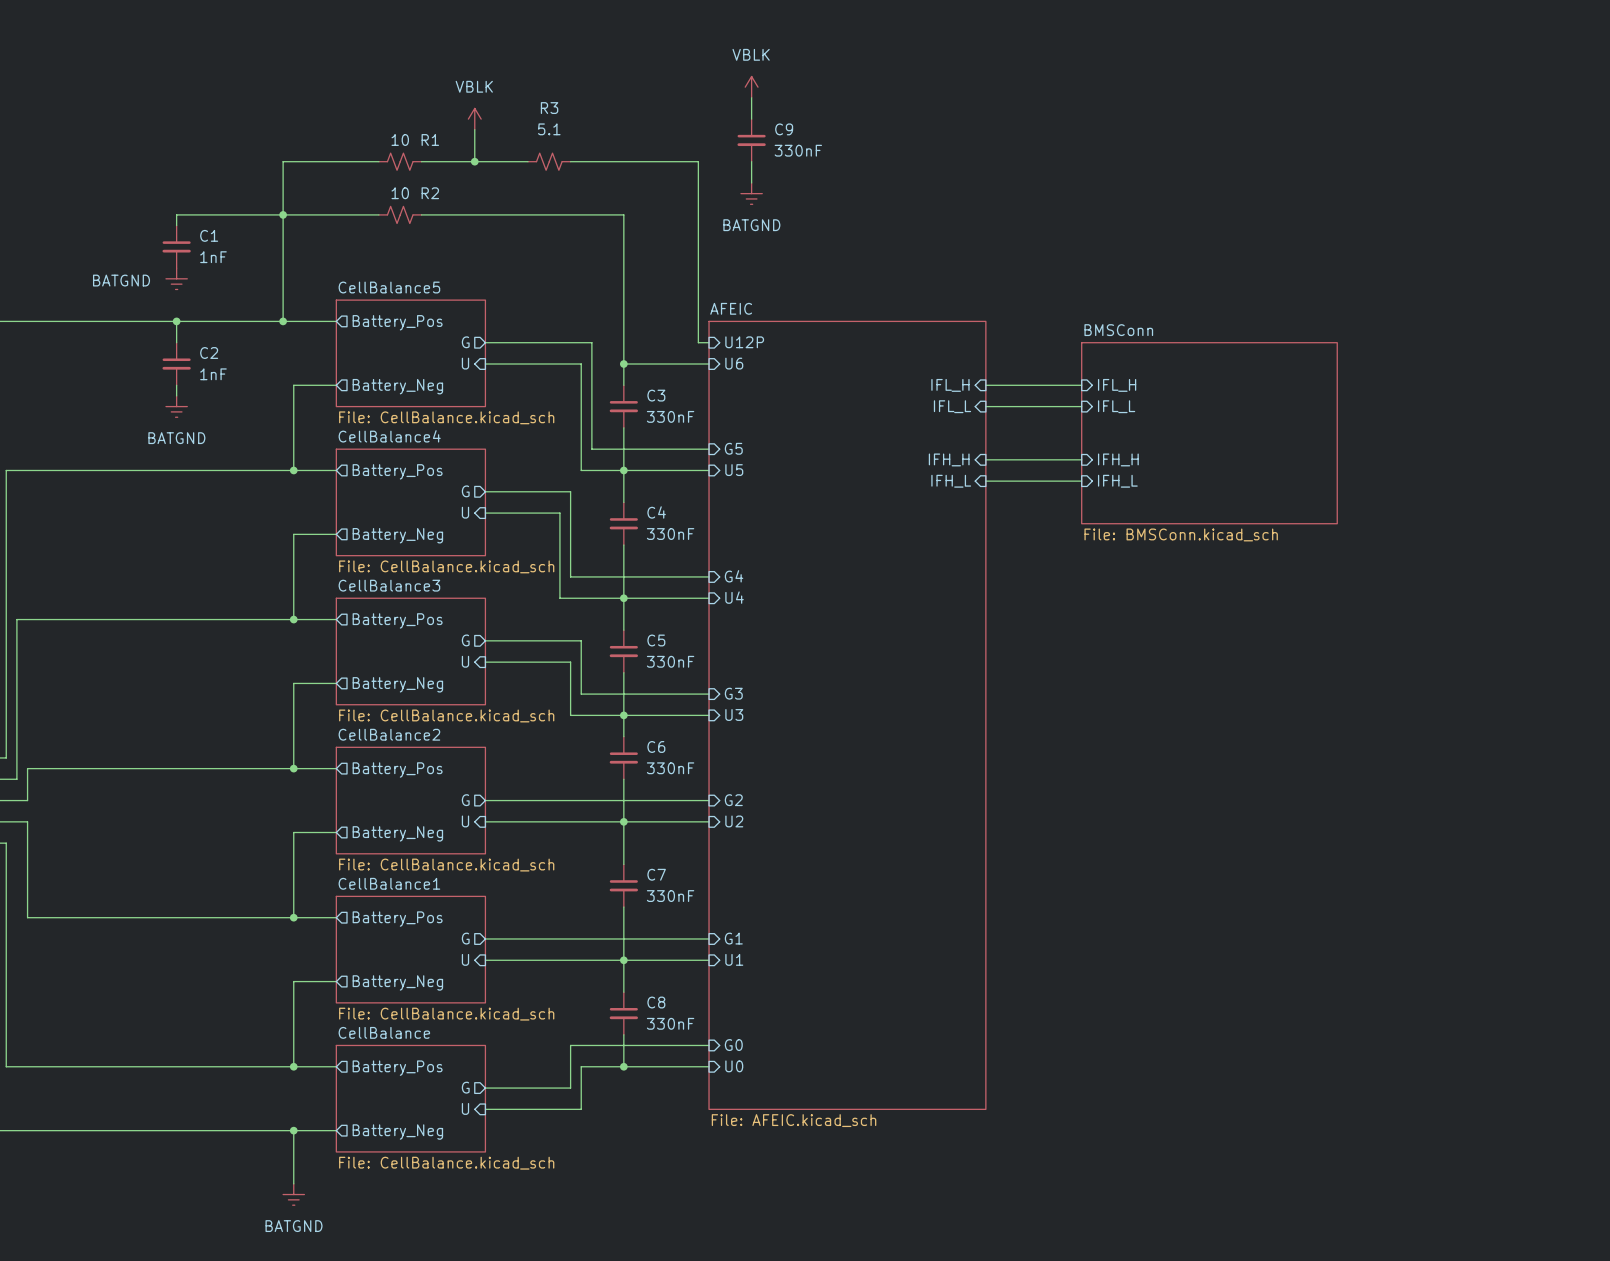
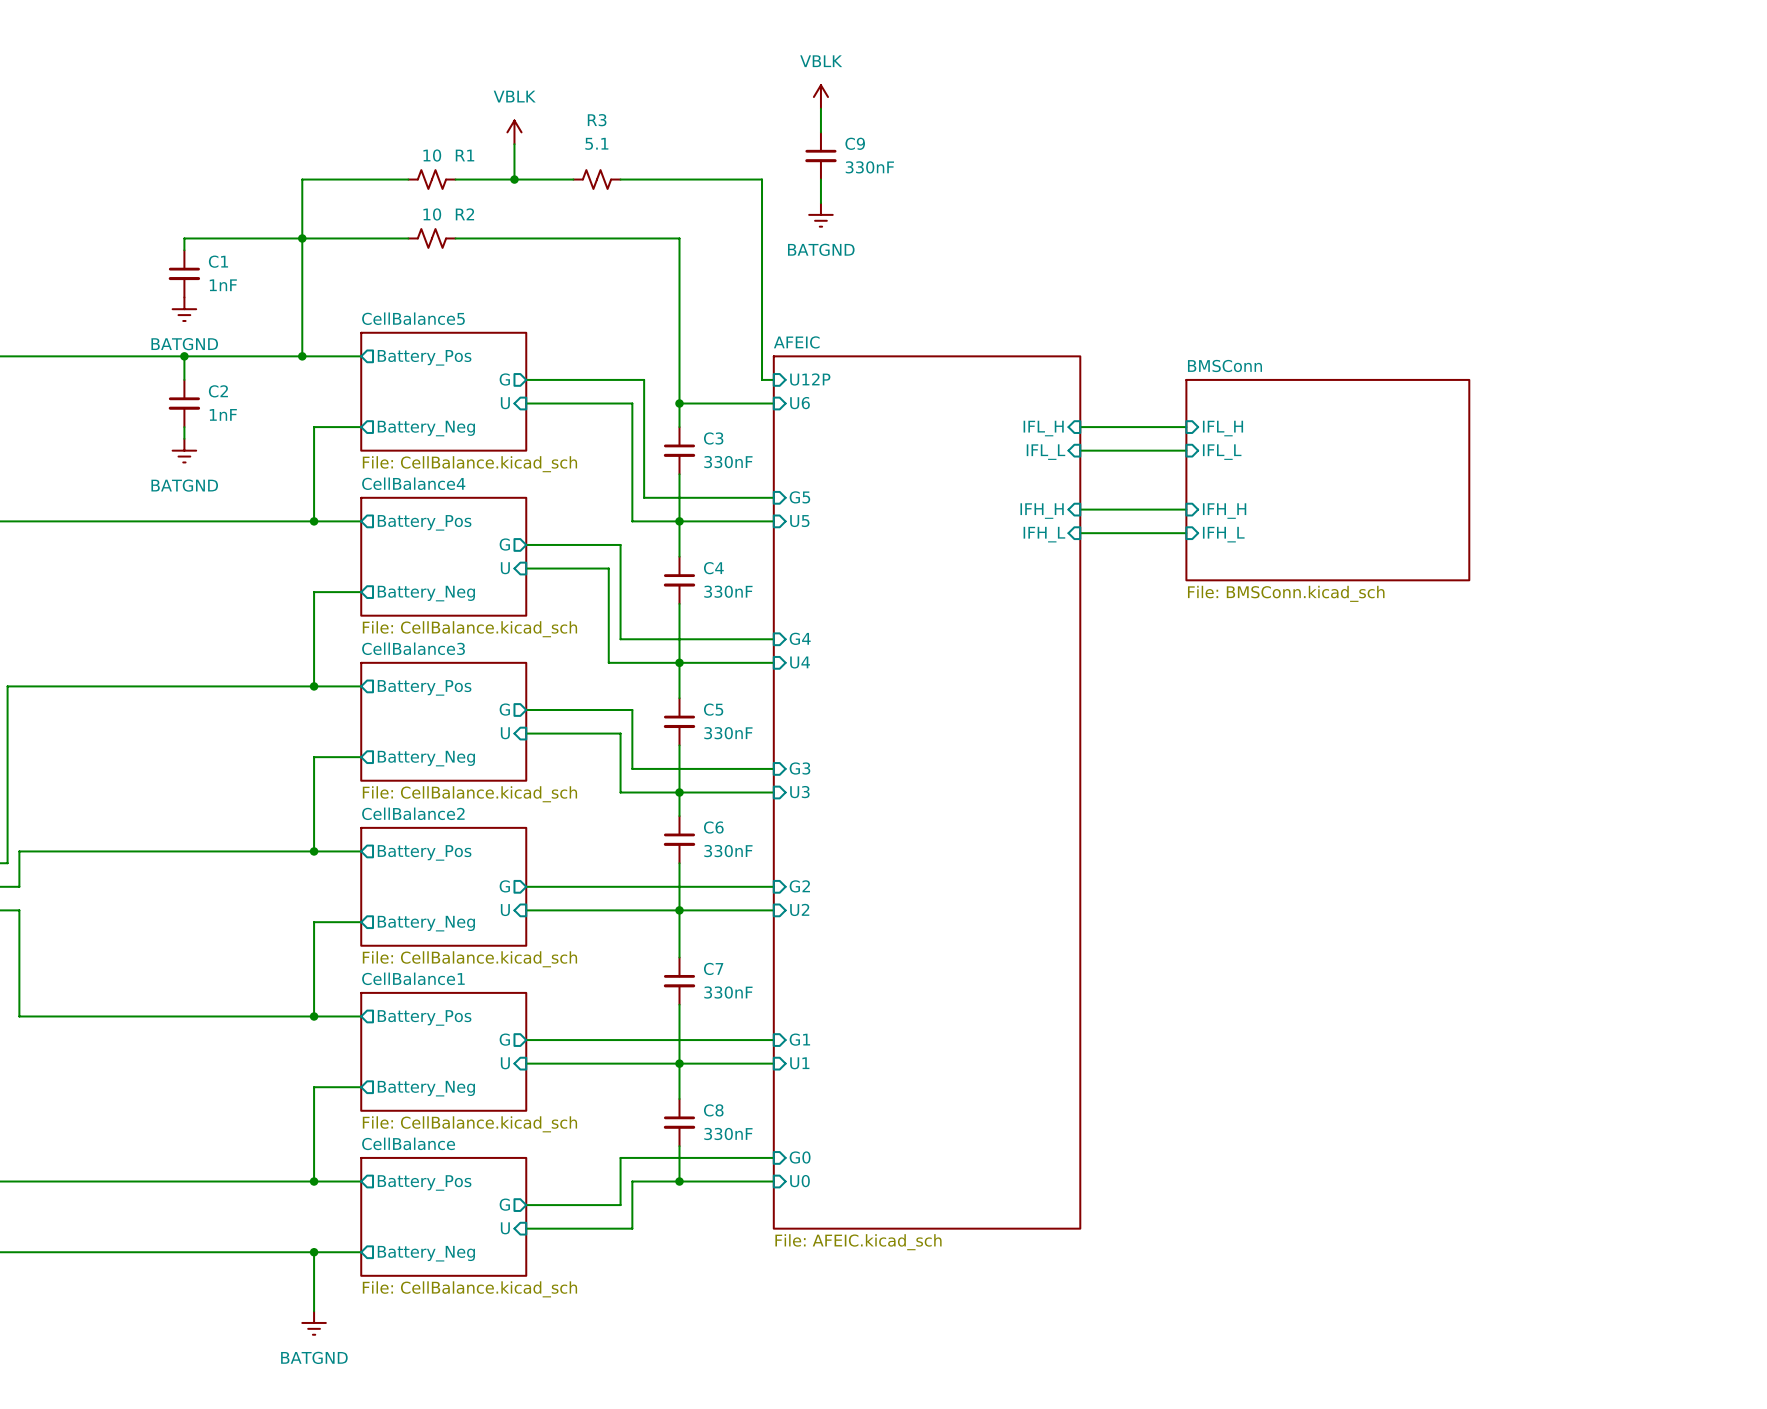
power symbol text position: BATGND (121, 280) -> BATGND (184, 344)

